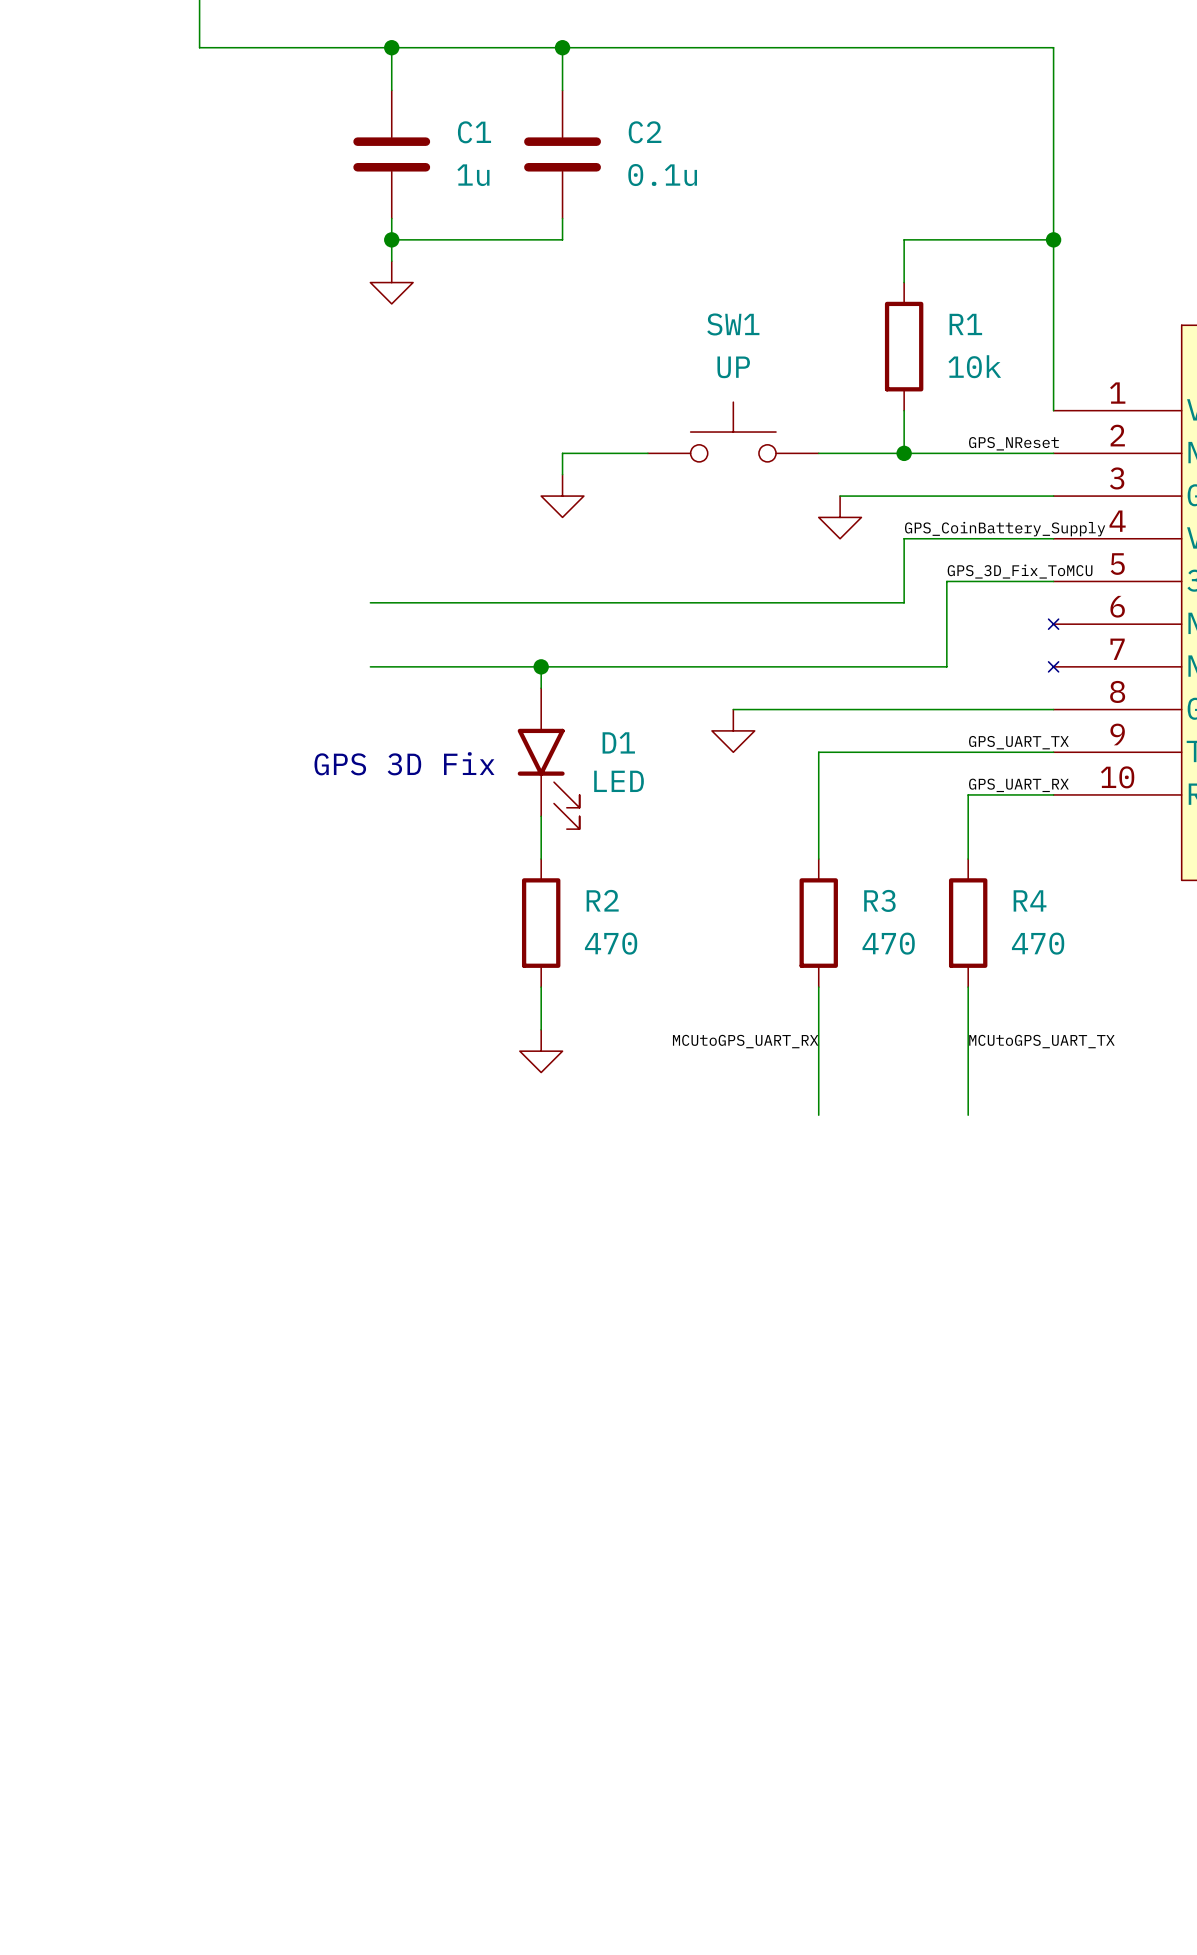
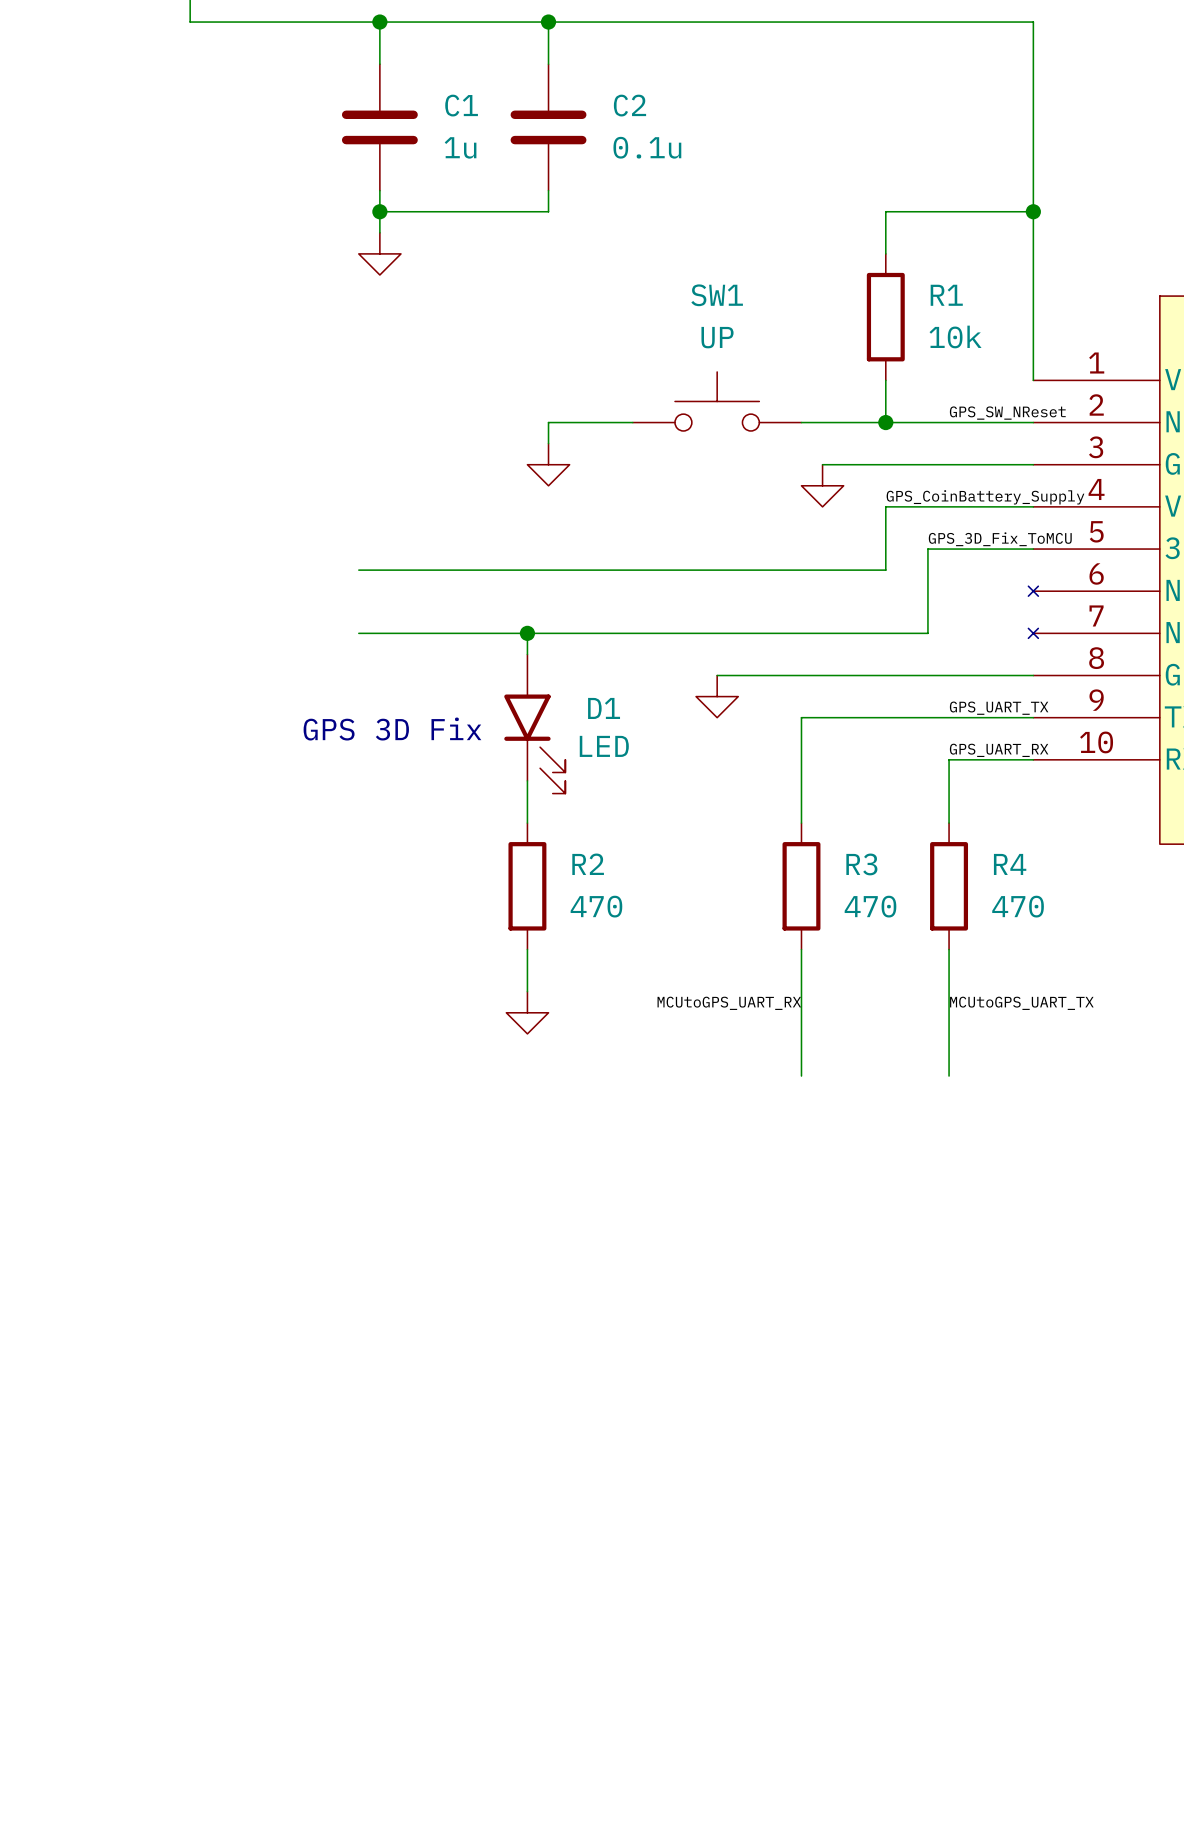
label: GPS_NReset (1013, 443) -> GPS_SW_NReset (1007, 413)

